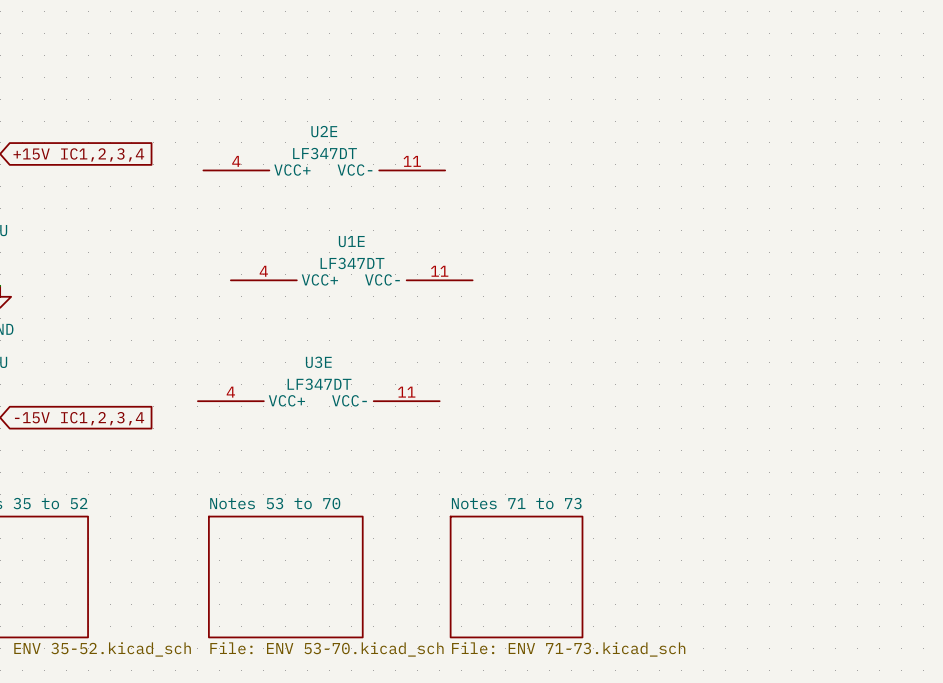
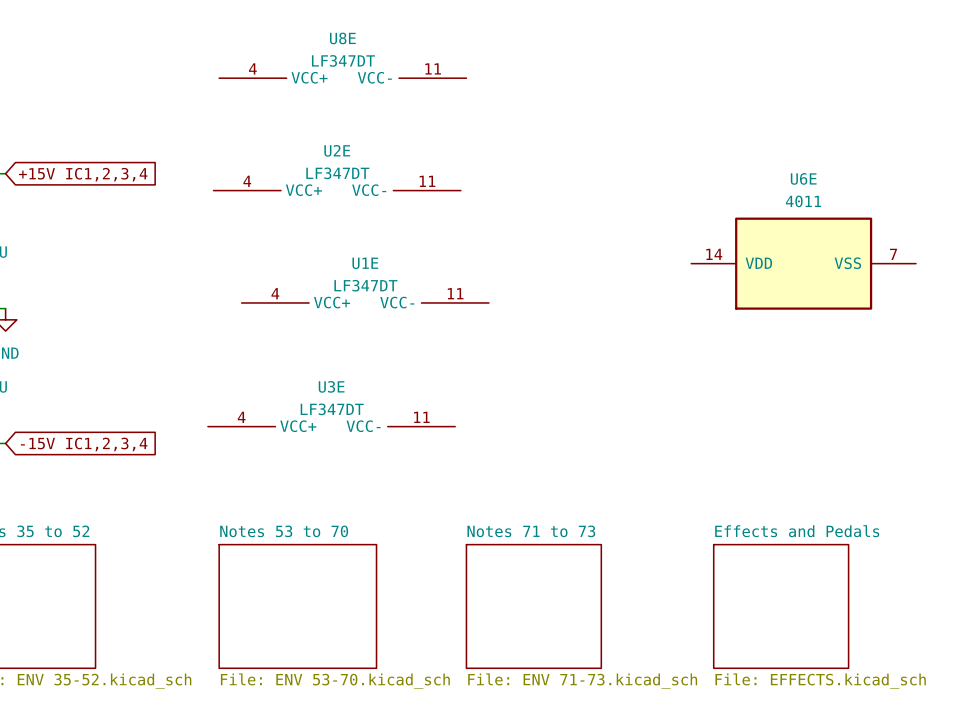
U8E: none -> LF347DT (342, 78)
U6E: none -> 4011 (803, 263)
sheet Effects and Pedals: none -> File: EFFECTS.kicad_sch (781, 606)

